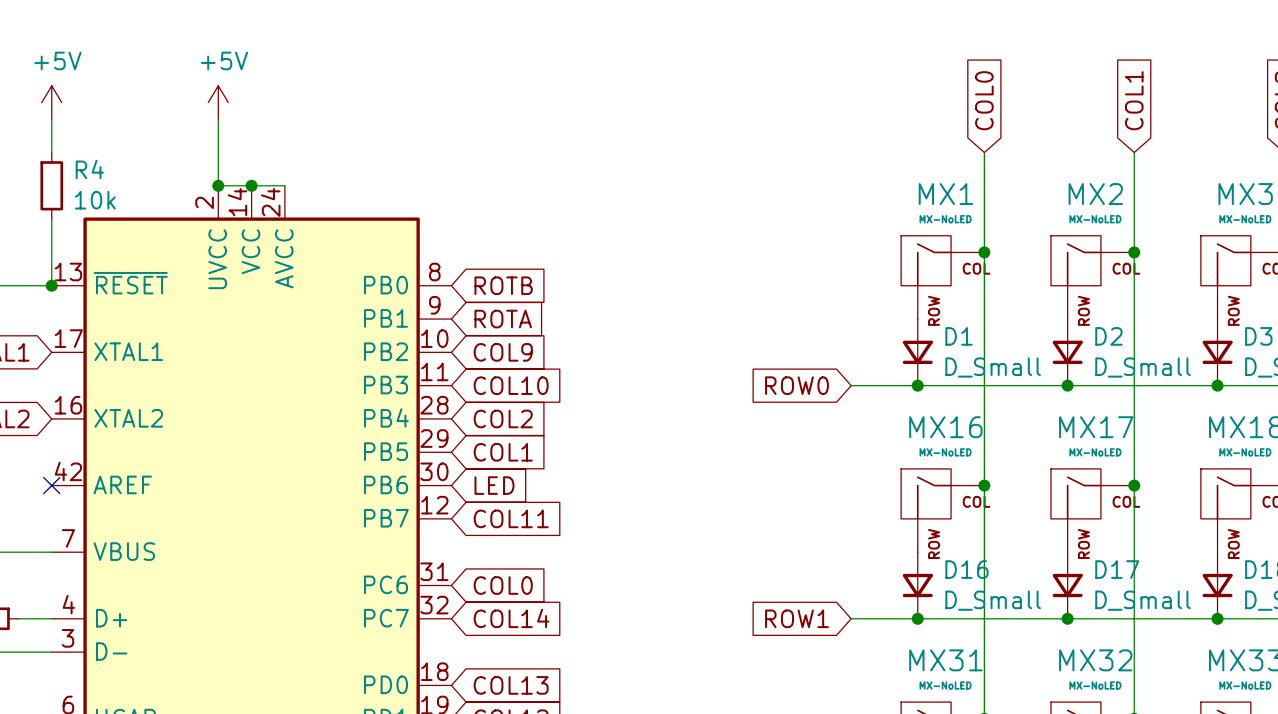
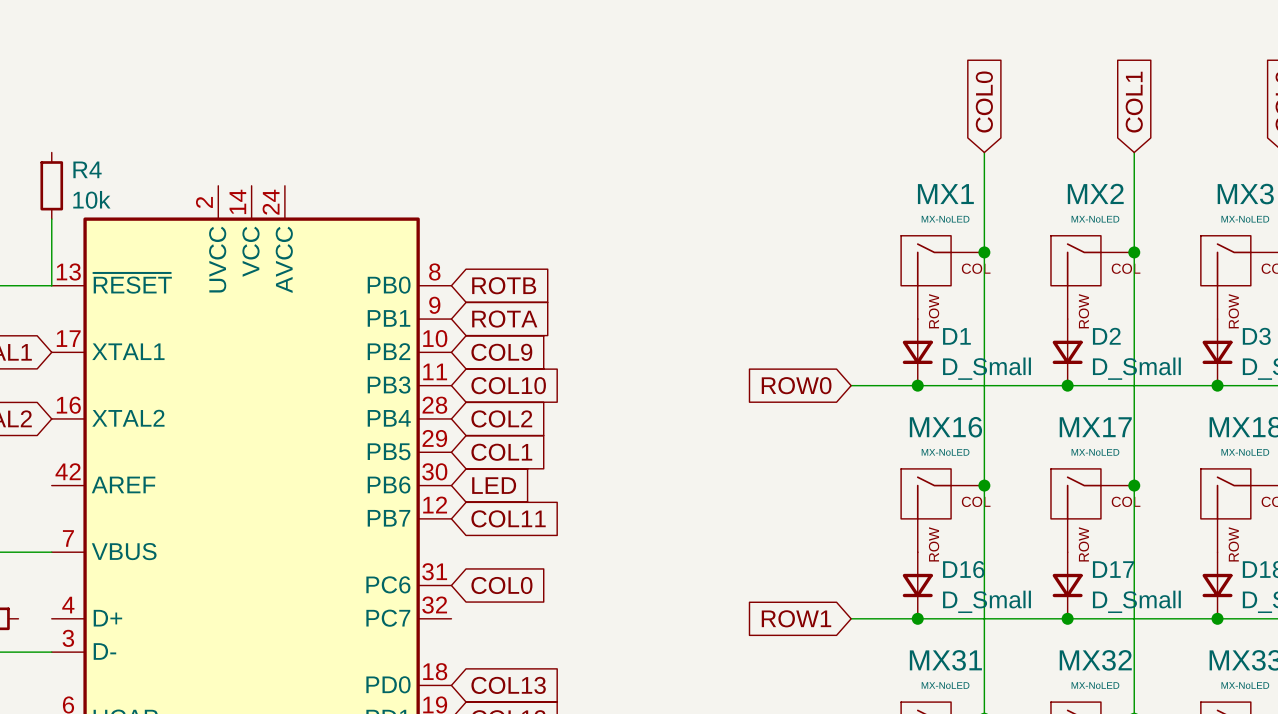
power symbol: +5V (51, 102) -> none
power symbol: +5V (218, 102) -> none
wire: (51, 119) (51, 152) -> none
wire: (218, 119) (218, 185) (284, 185) -> none
junction: (218, 185) -> none
junction: (251, 185) -> none
junction: (51, 285) -> none
no-connect mark: (51, 485) -> none
wire: (18, 618) (51, 618) -> none
global label: COL14 (511, 618) -> none

